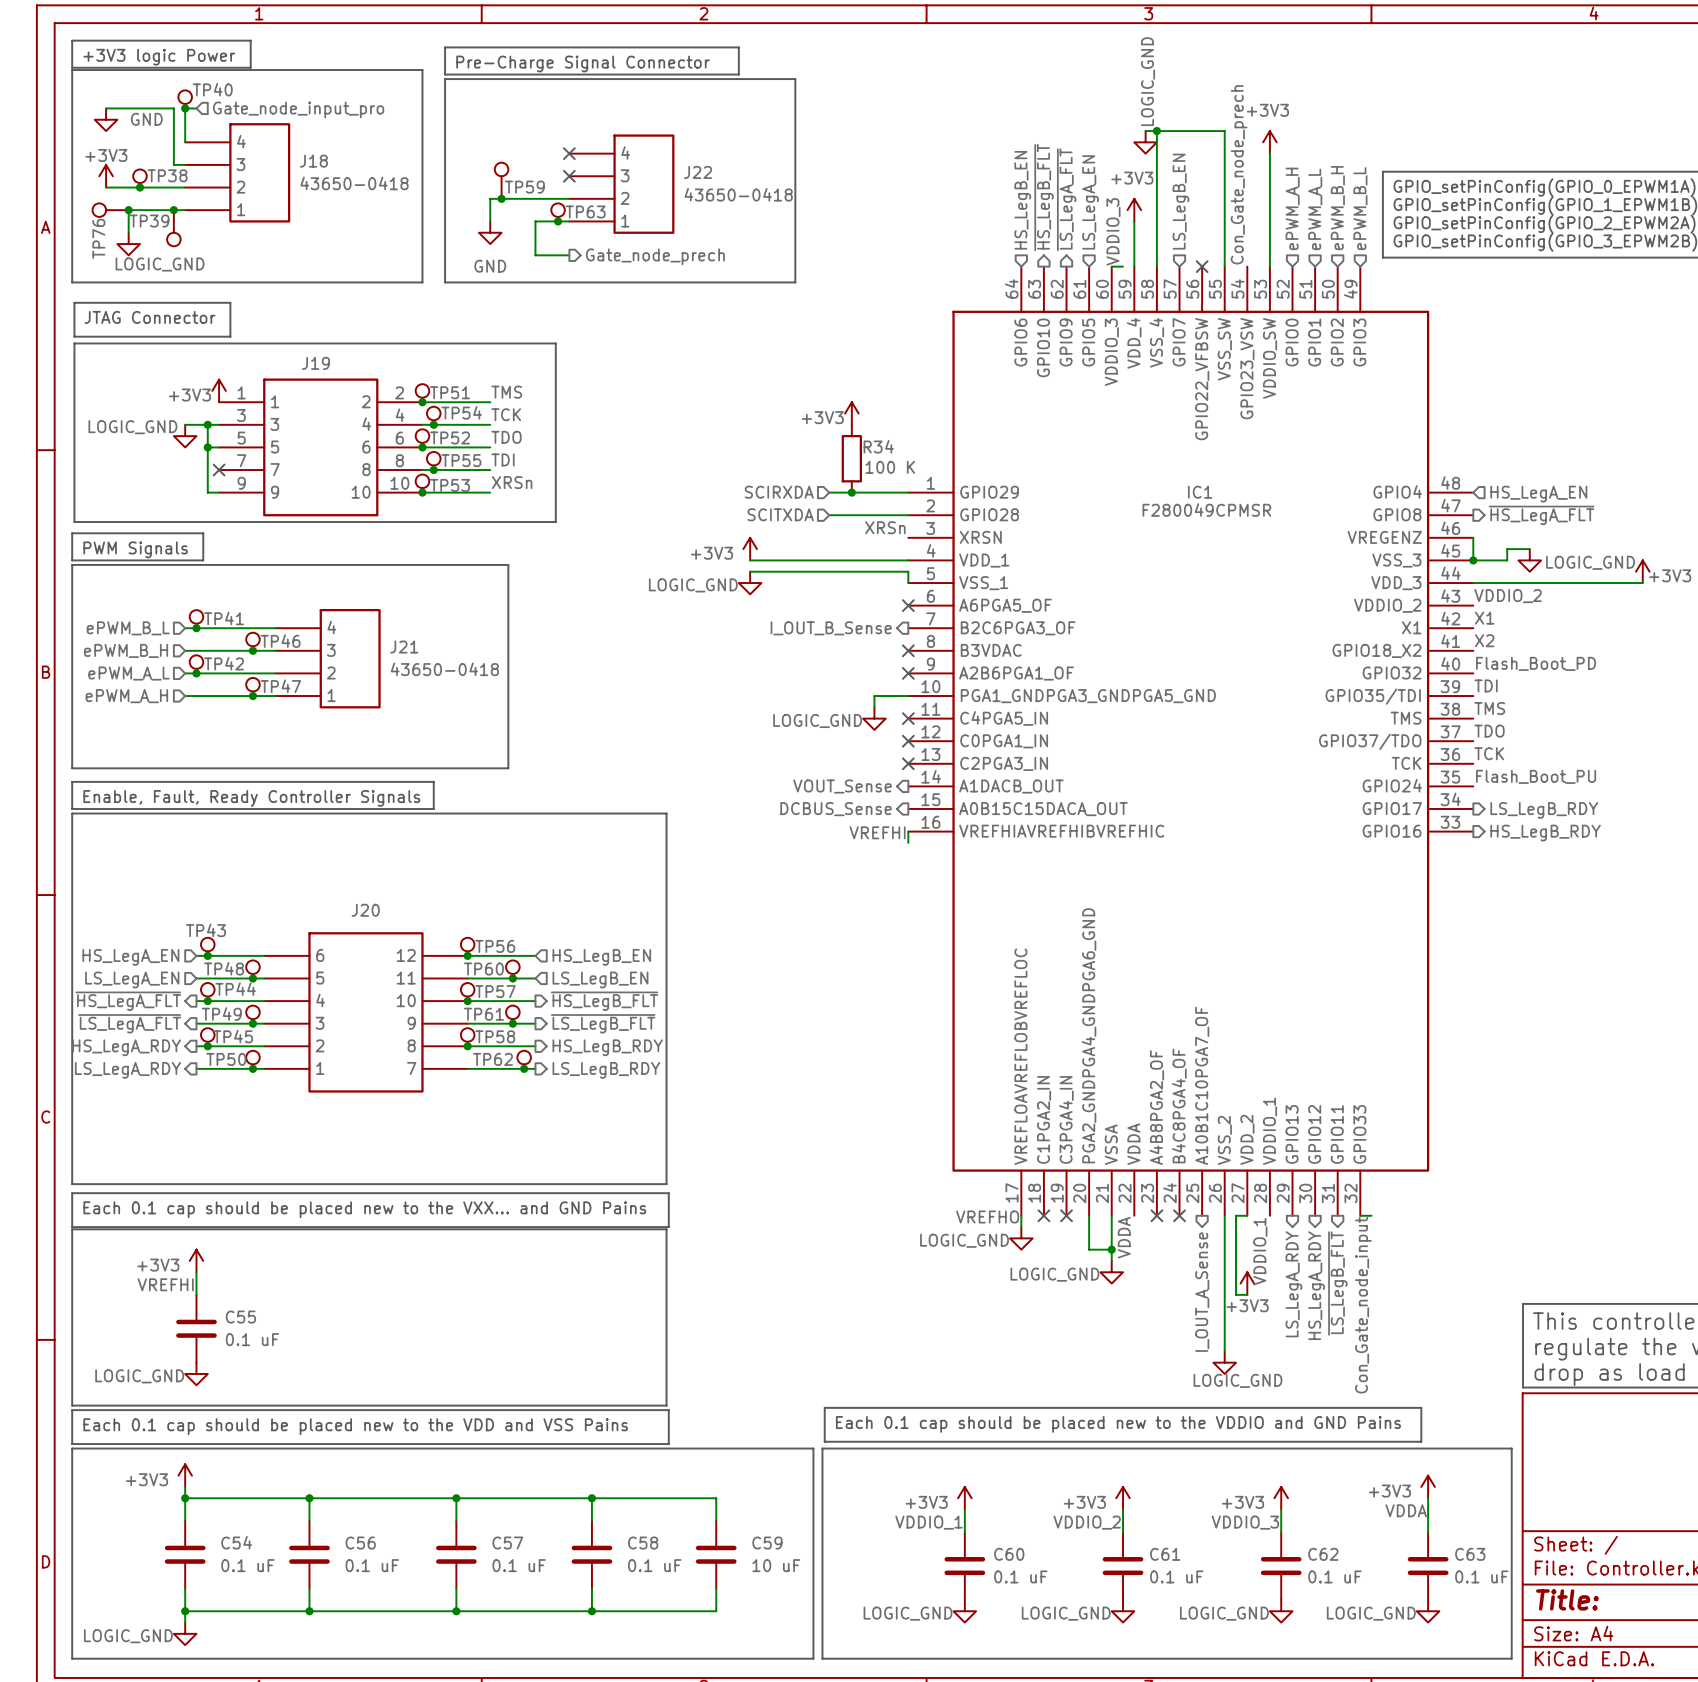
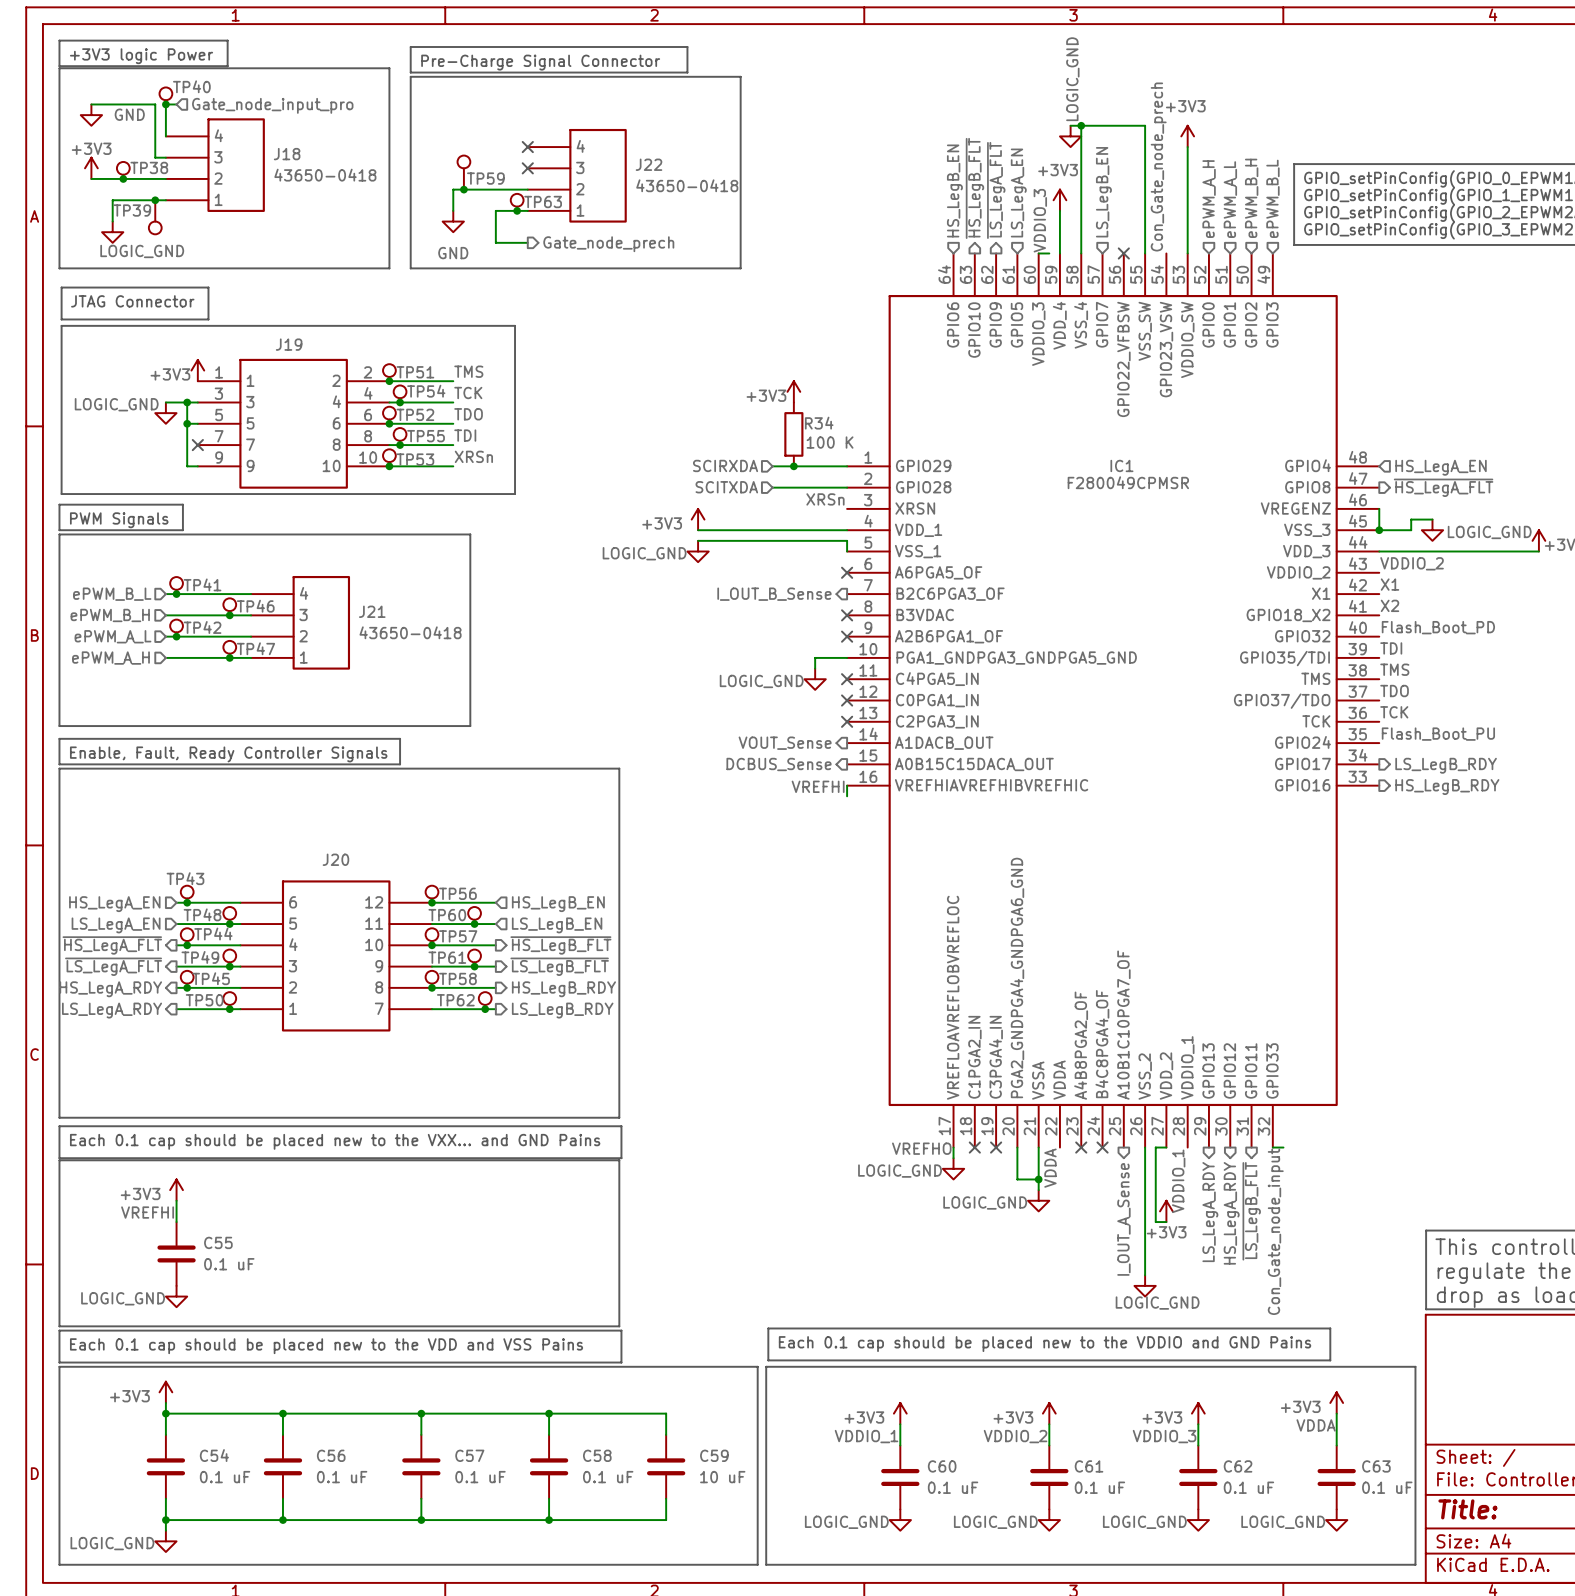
TP76: (110, 210) -> none
junction: (128, 210) -> none

